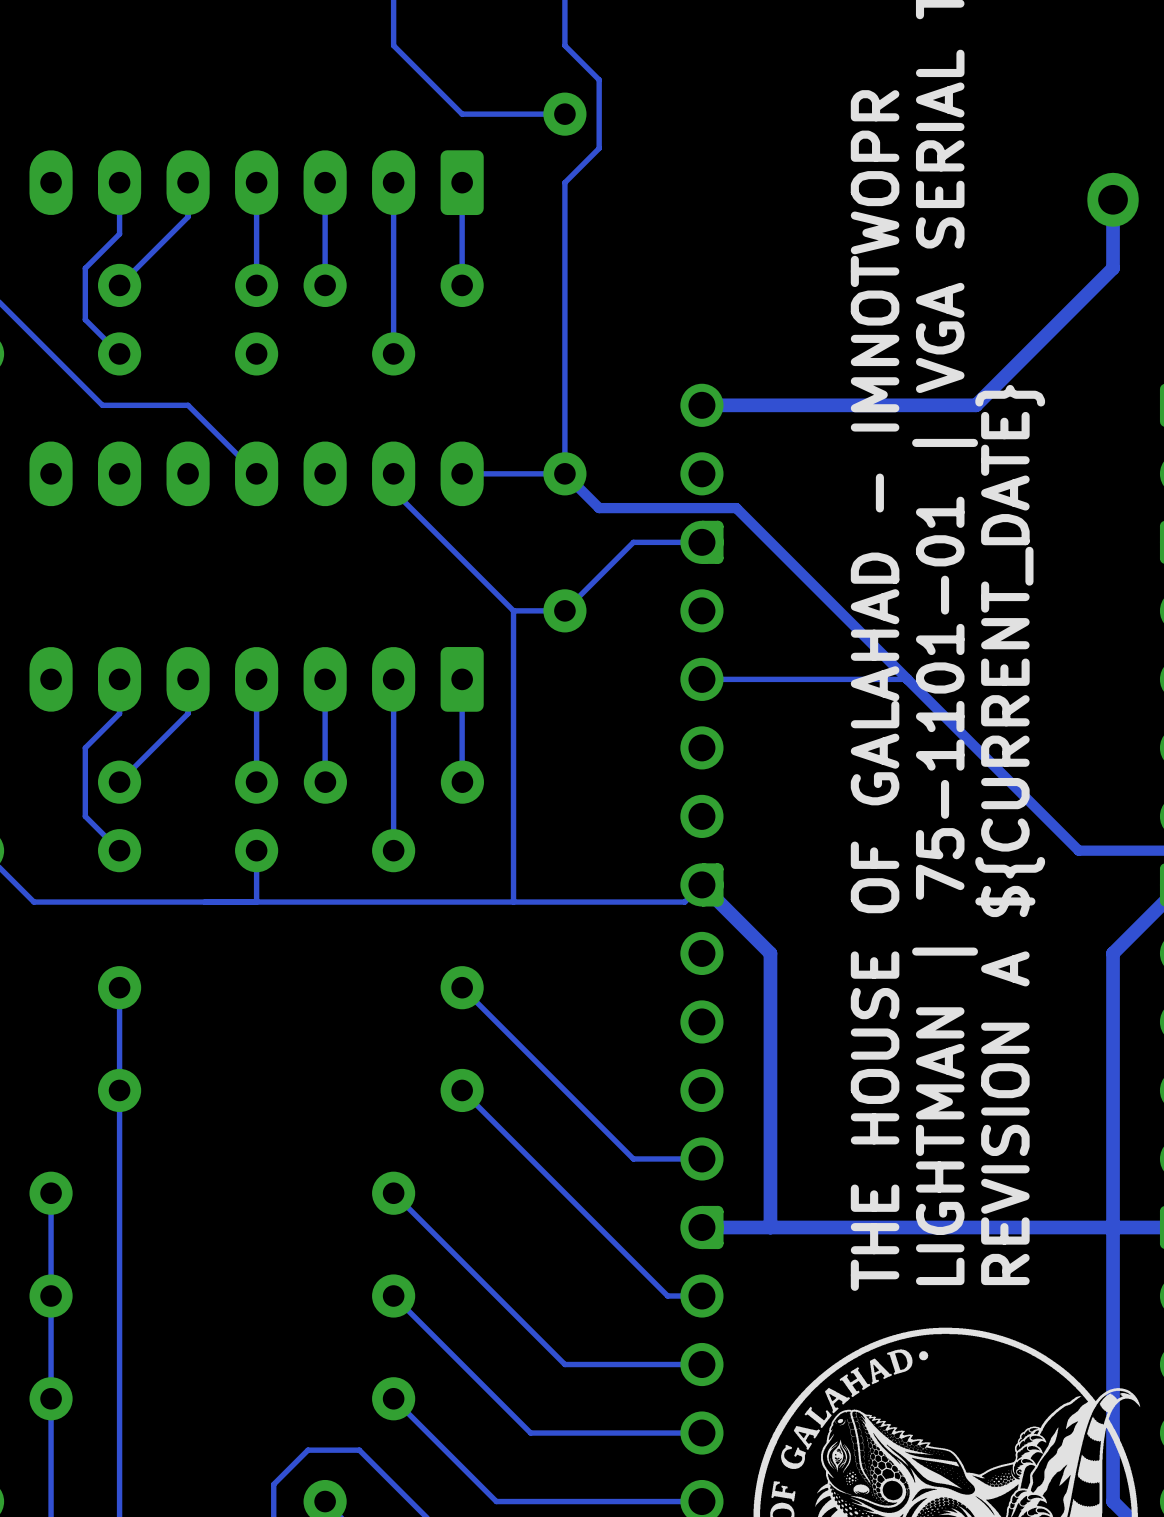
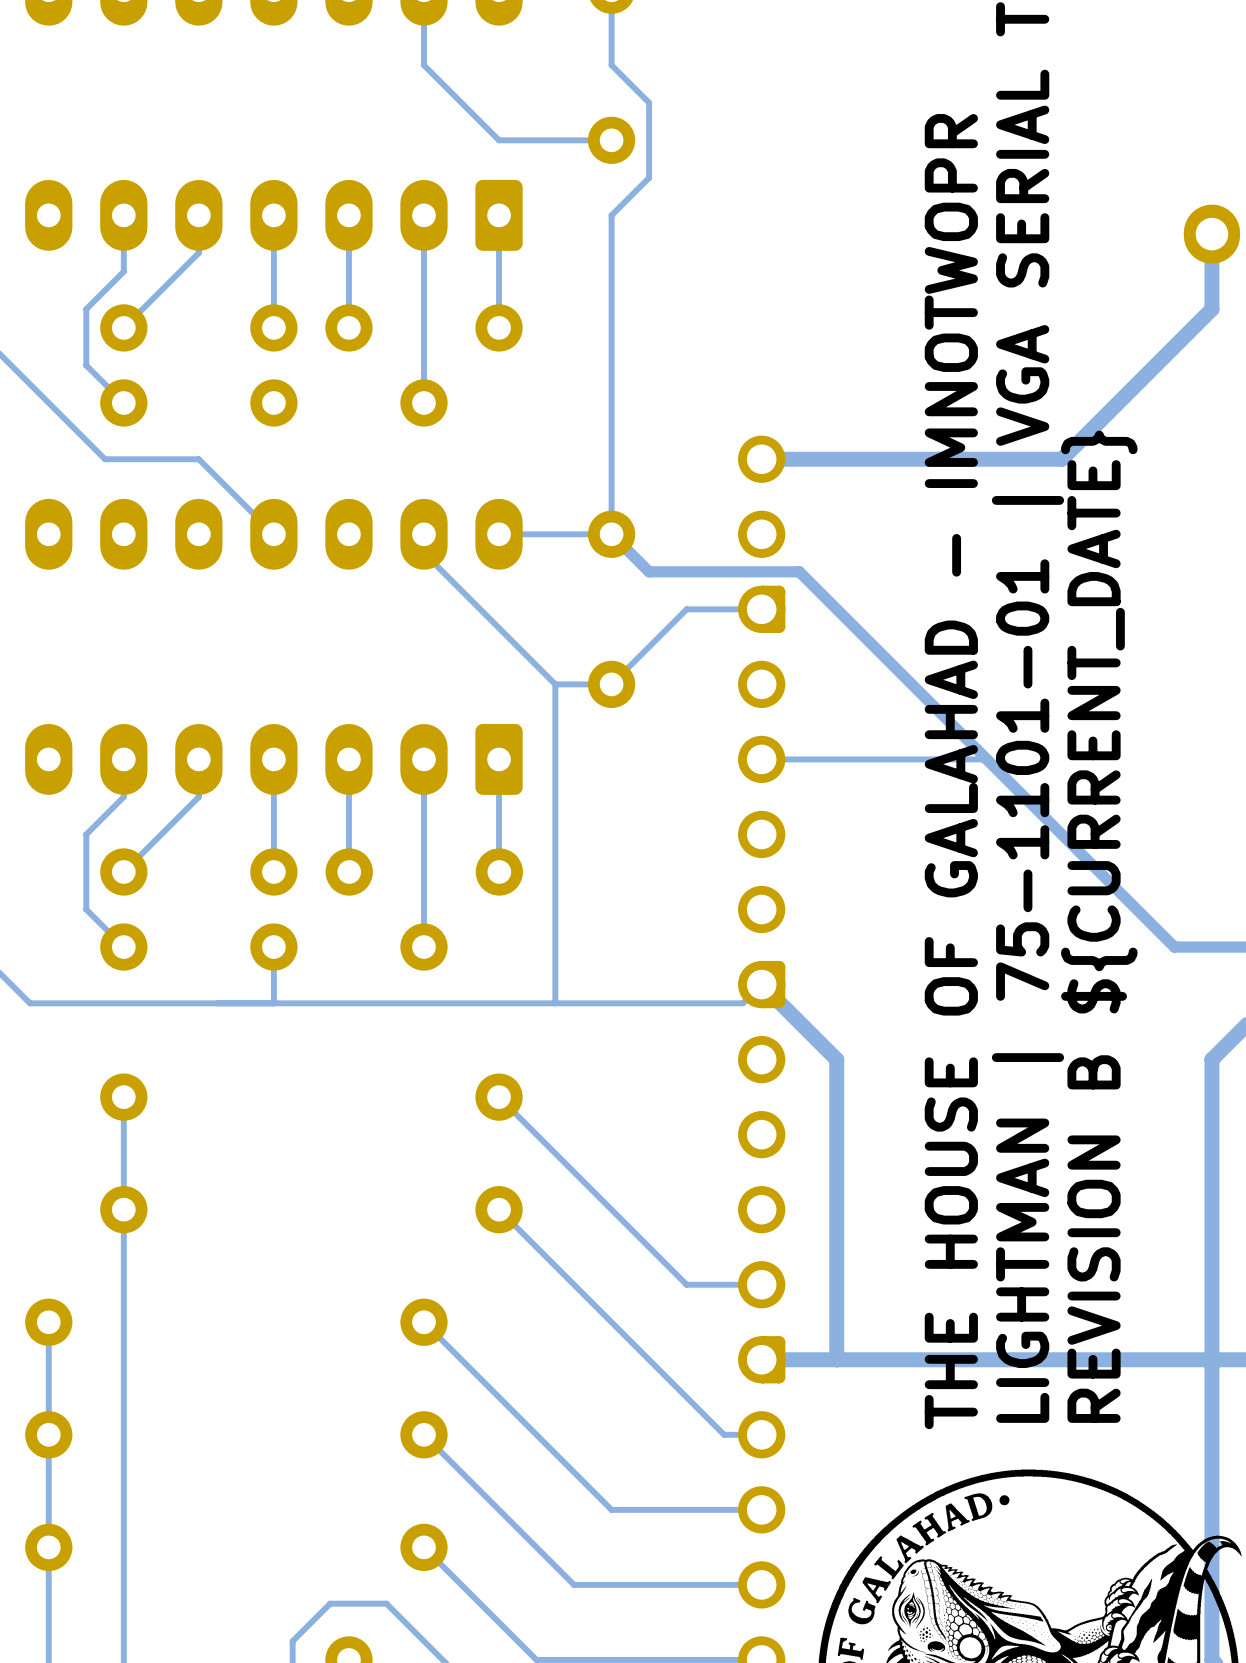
text: REVISION A ${CURRENT_DATE} (1010, 835) -> REVISION B ${CURRENT_DATE} (1099, 926)

